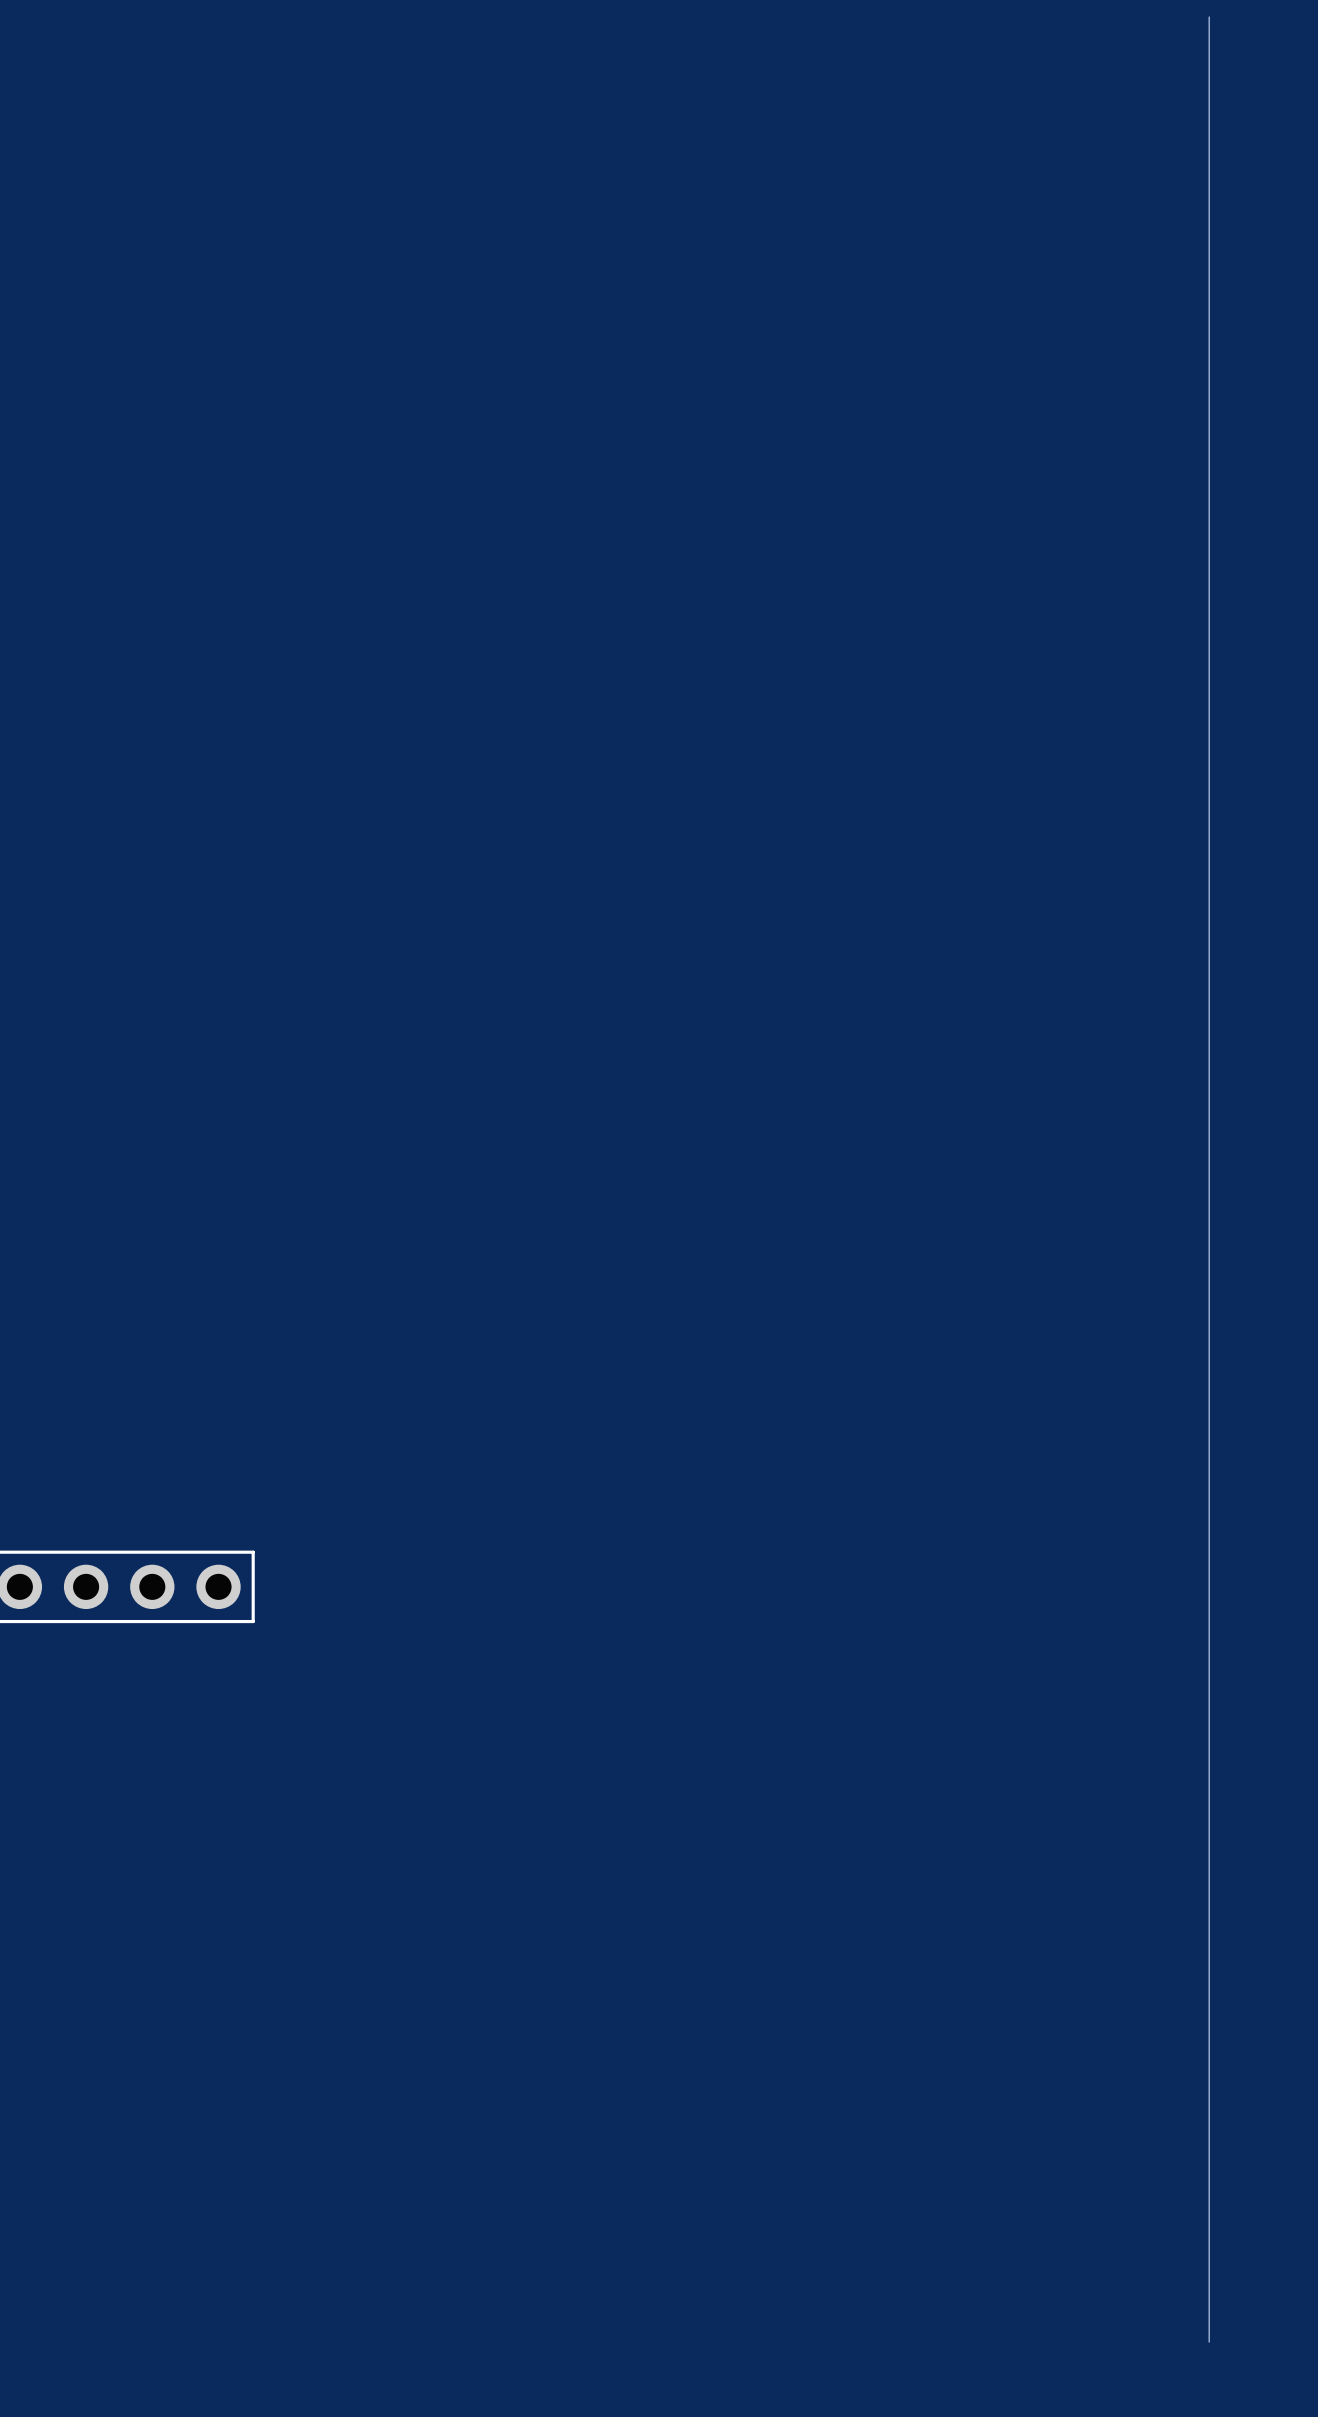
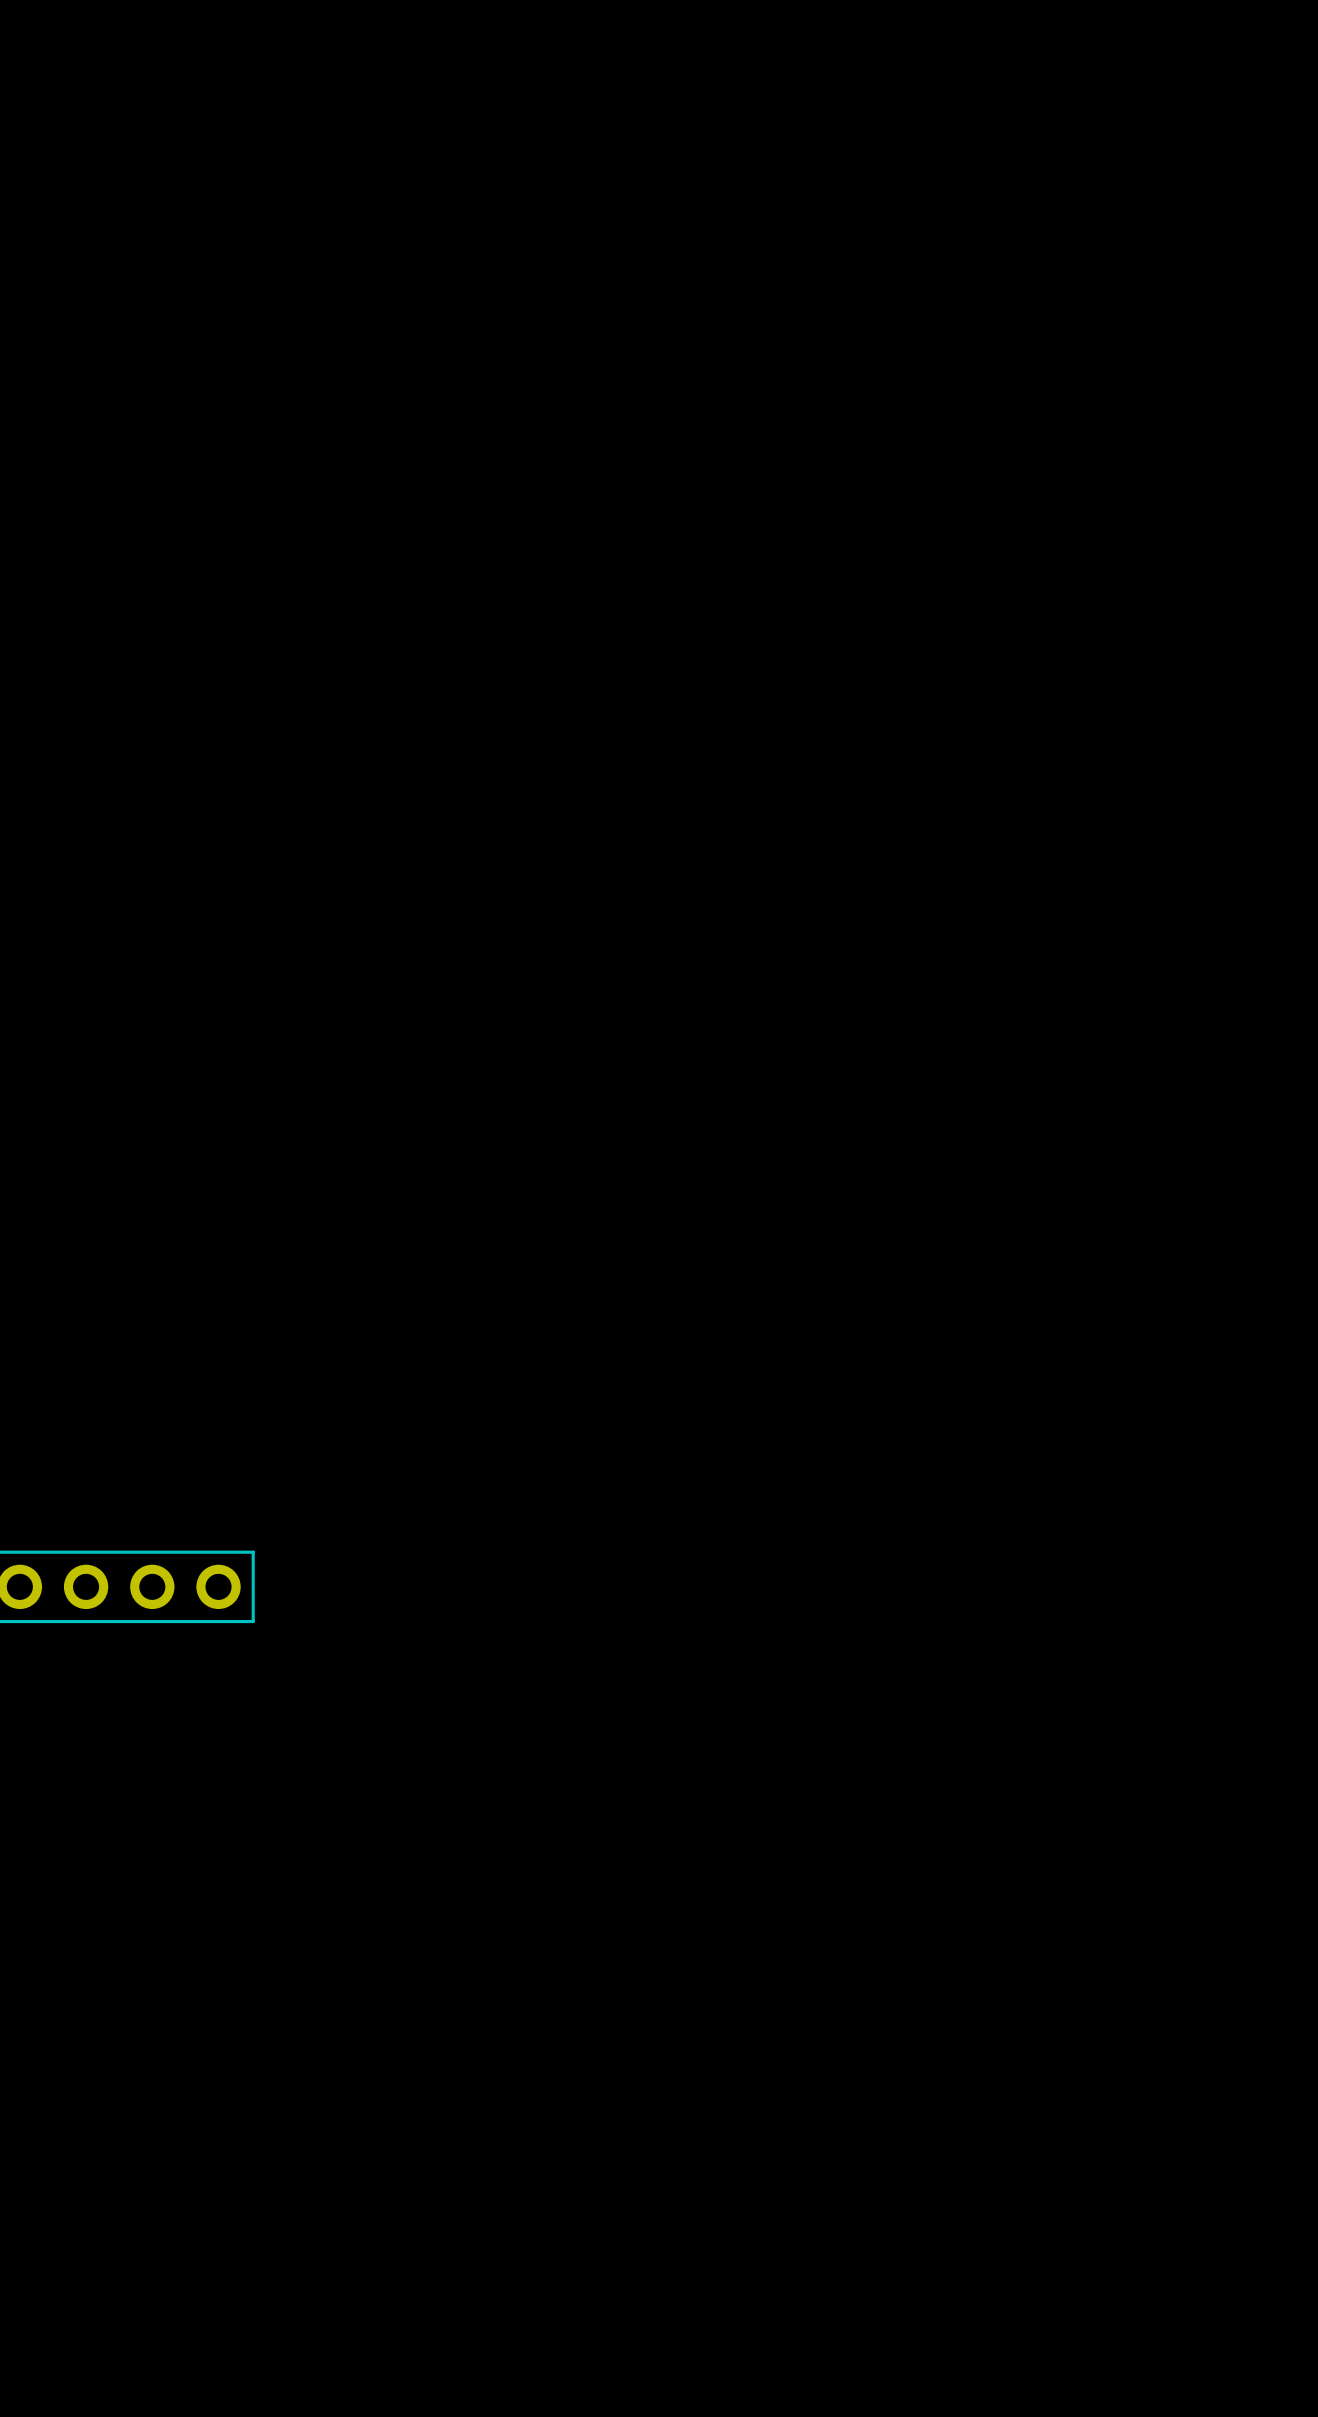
board edge: (1209, 16) (1209, 2342) -> none

